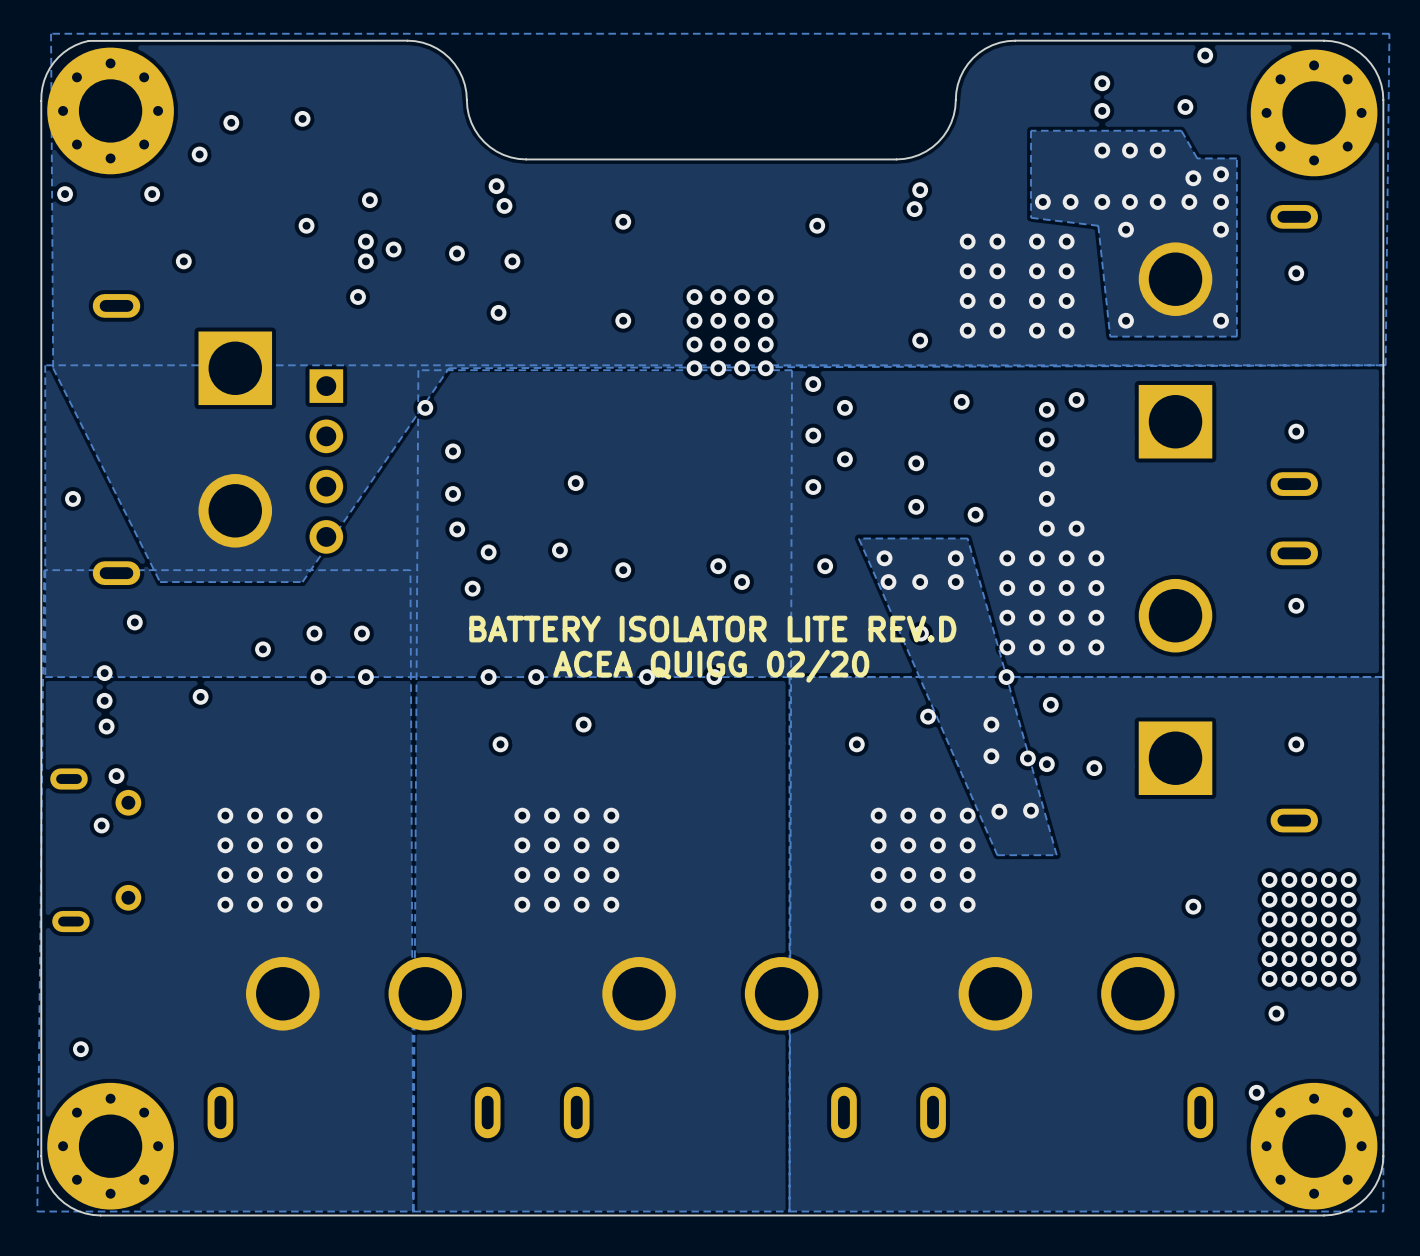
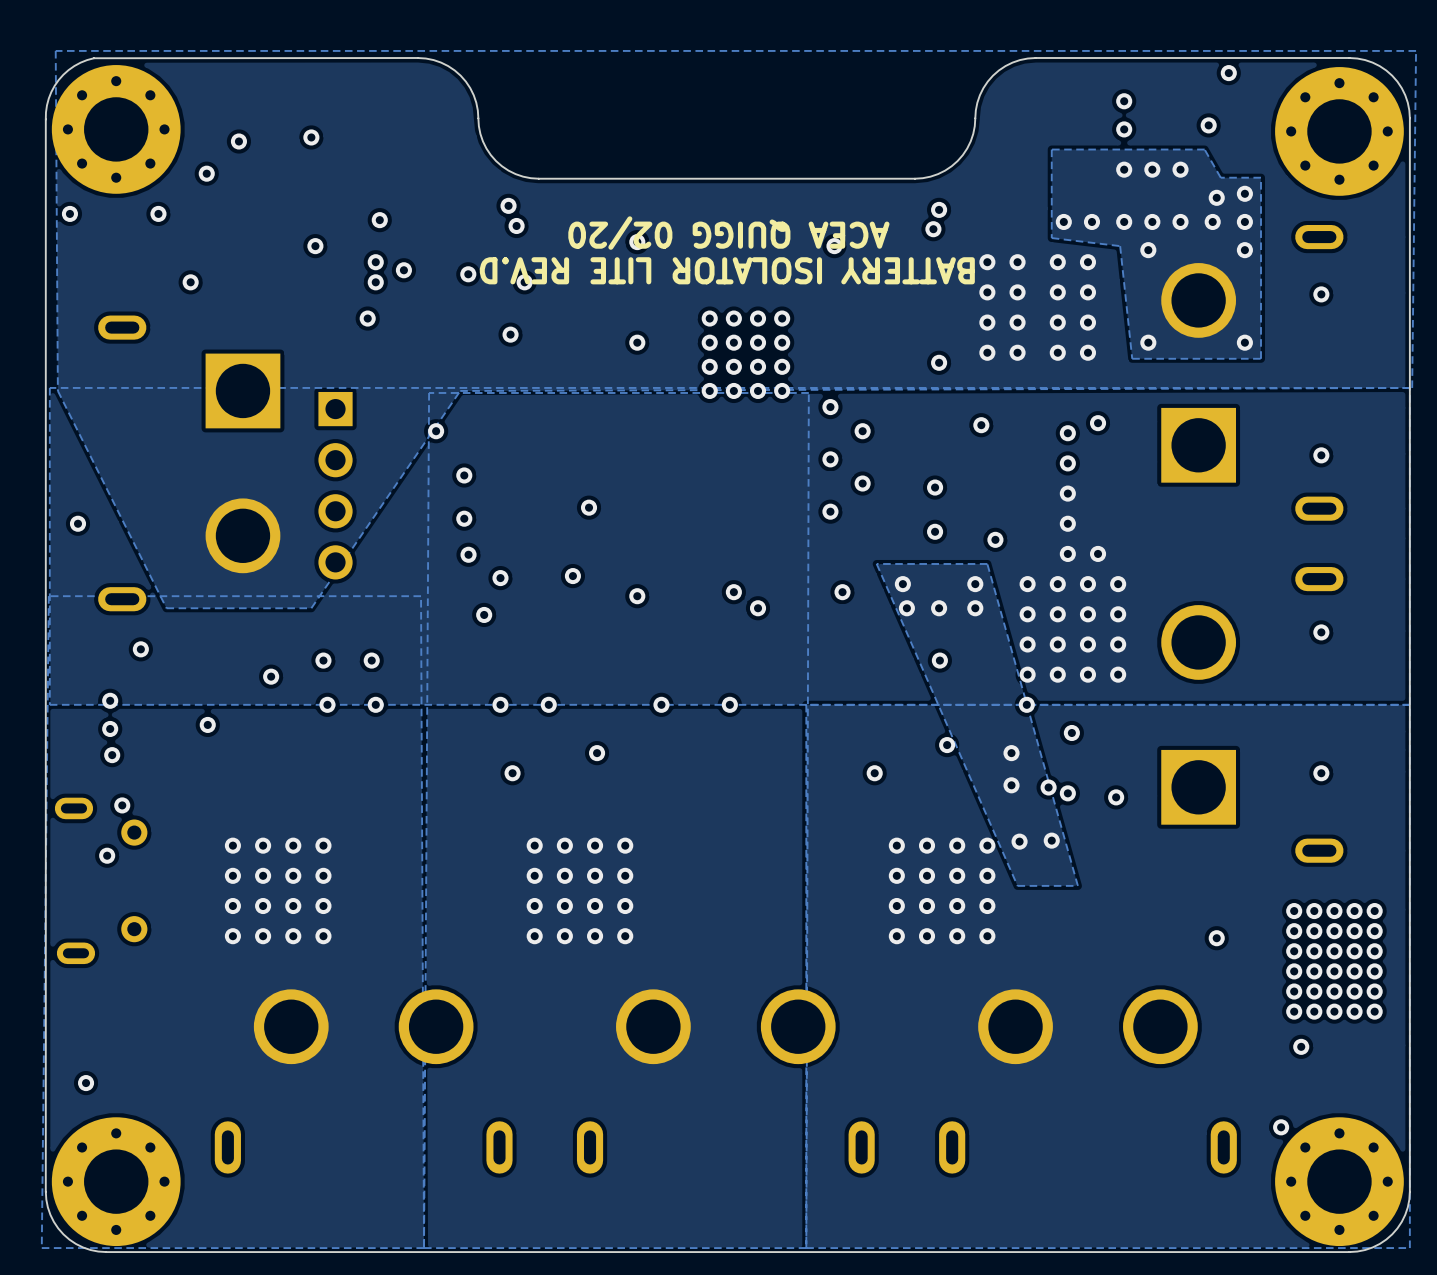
text rotation: 0° (712, 629) -> 180° (727, 270)
text rotation: 0° (711, 666) -> 180° (728, 233)
text position: ACEA QUIGG 02/20 (711, 666) -> ACEA QUIGG 02/20 (728, 233)

